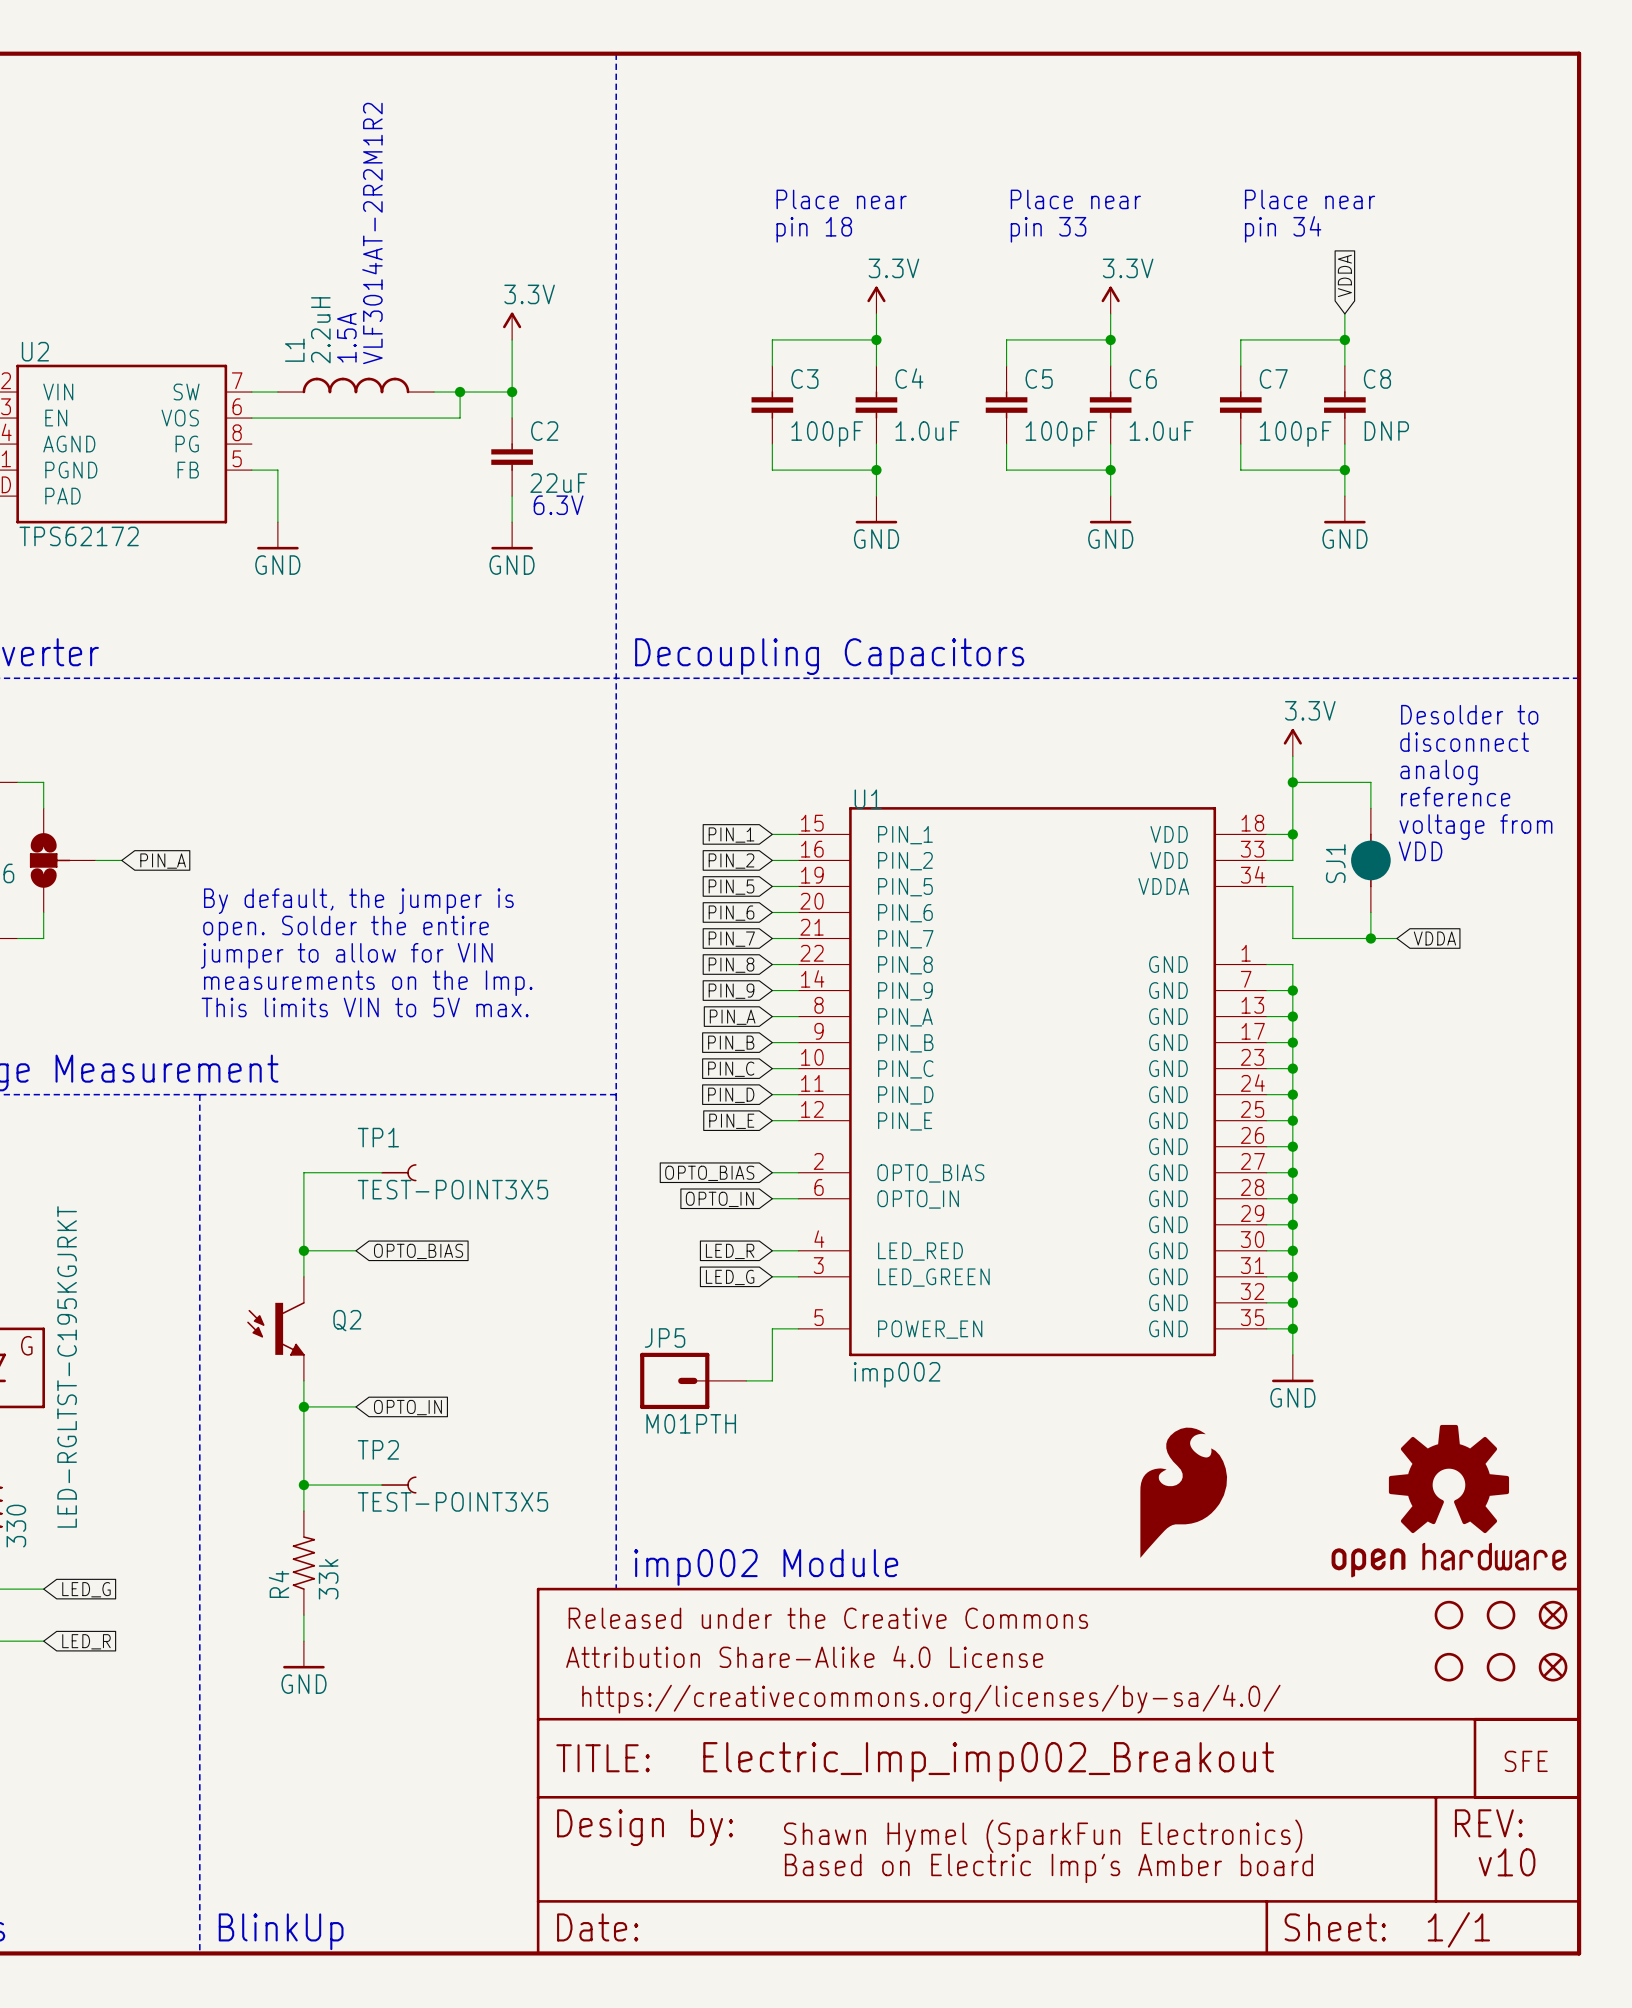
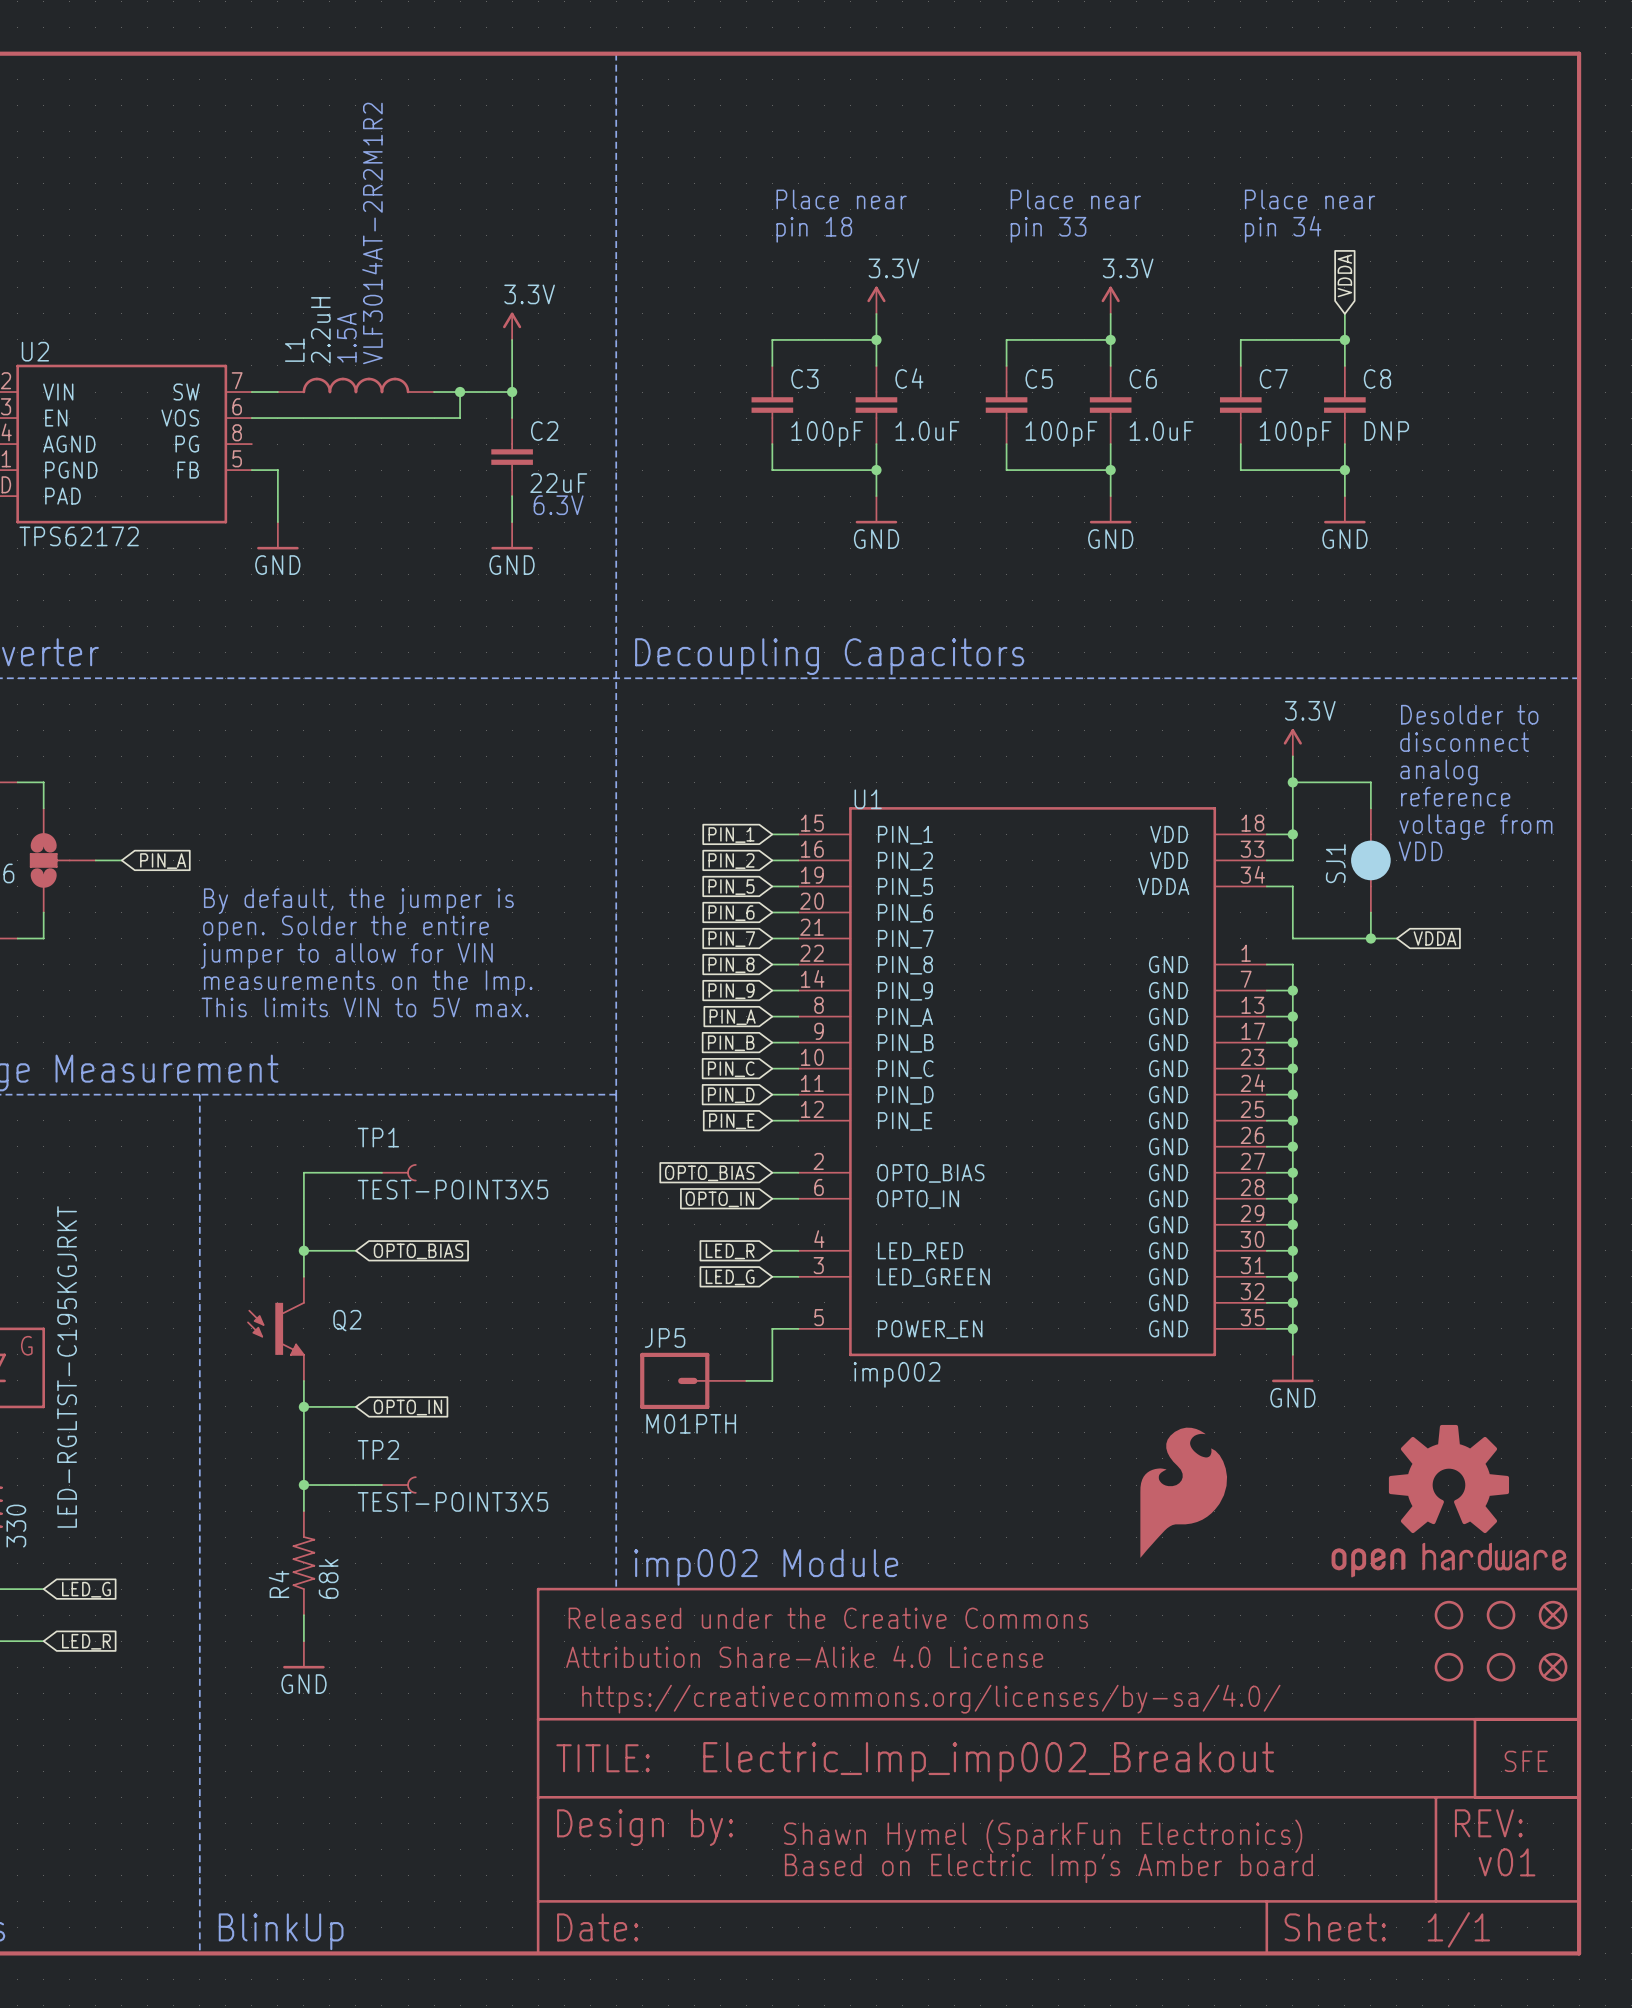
R4 value: 33k (328, 1579) -> 68k (328, 1578)
text: v10 (1507, 1862) -> v01 (1507, 1862)

